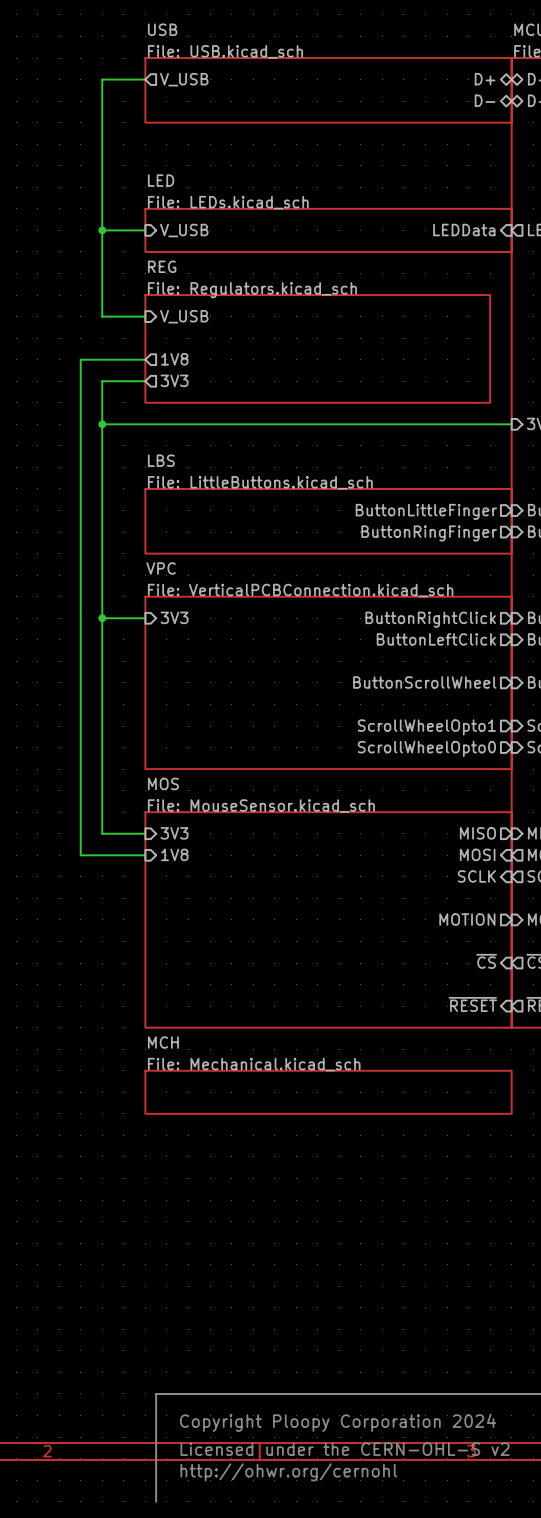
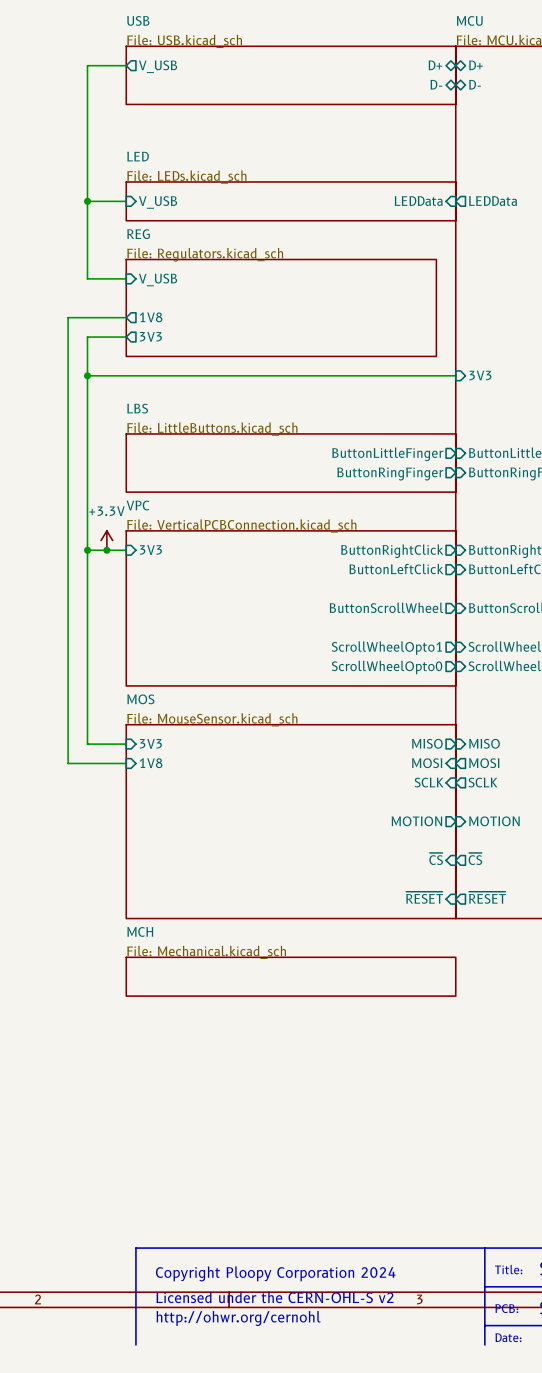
power symbol: none -> +3.3V (106, 540)
junction: none -> (106, 550)

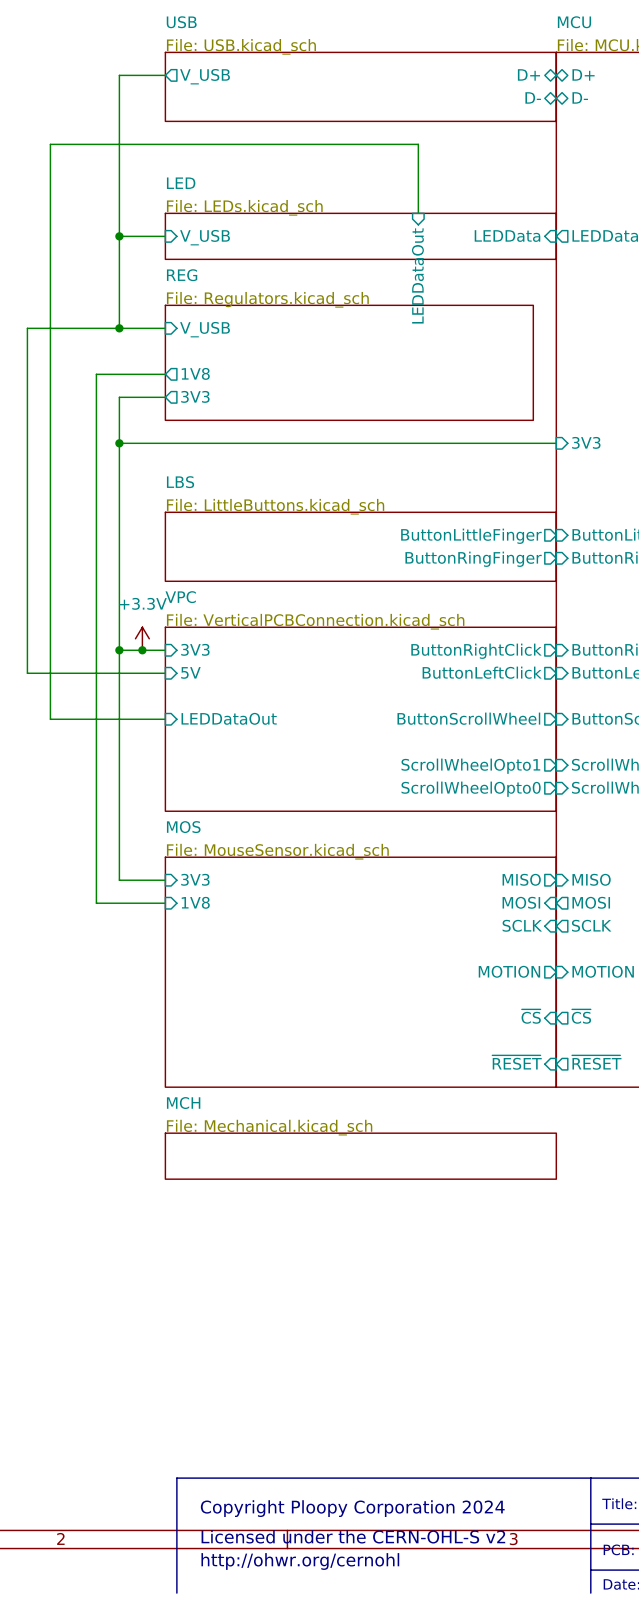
wire: none -> (418, 213) (418, 144) (50, 144) (50, 719) (165, 719)
sheet pin: none -> LEDDataOut (417, 275)
wire: none -> (119, 328) (27, 328) (27, 673) (165, 673)
junction: none -> (119, 328)
sheet pin: none -> 5V (190, 672)
sheet pin: none -> LEDDataOut (229, 718)

